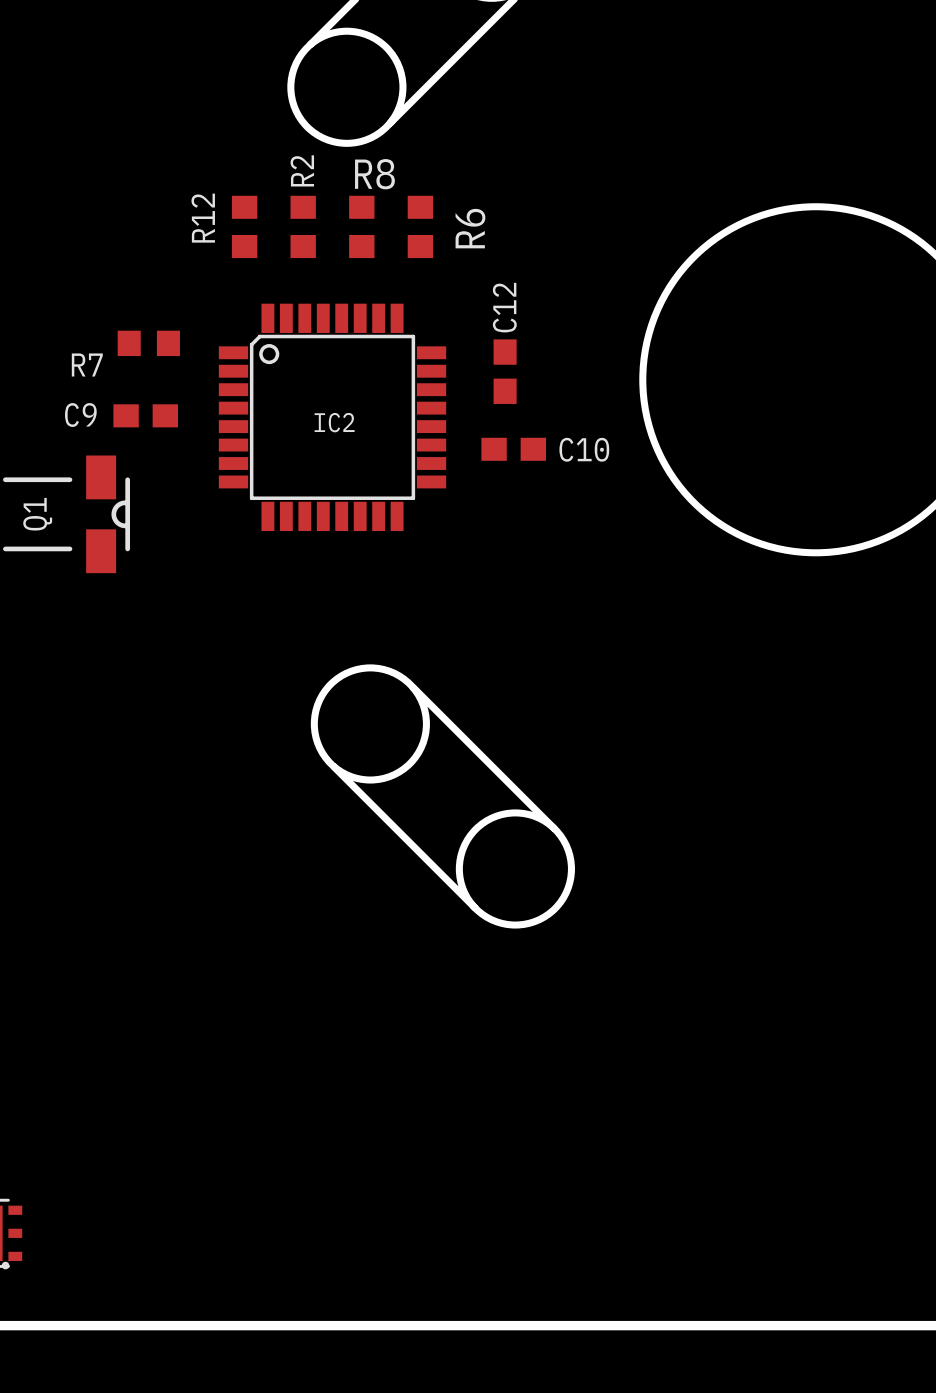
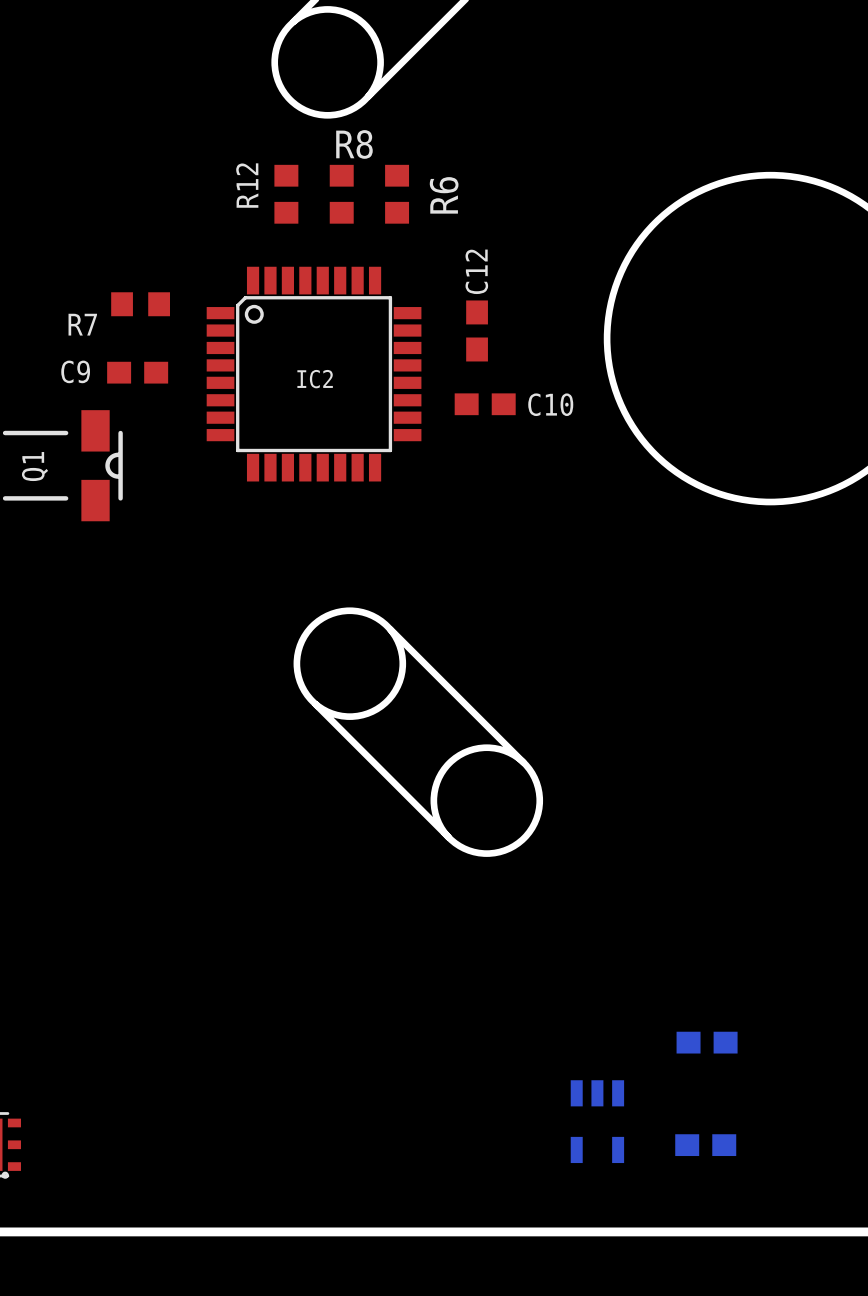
R2 name: R2 (302, 170) -> R12 (247, 185)
R12: (244, 226) -> none
part: none -> (707, 1042)
part: none -> (597, 1121)
part: none -> (705, 1145)

